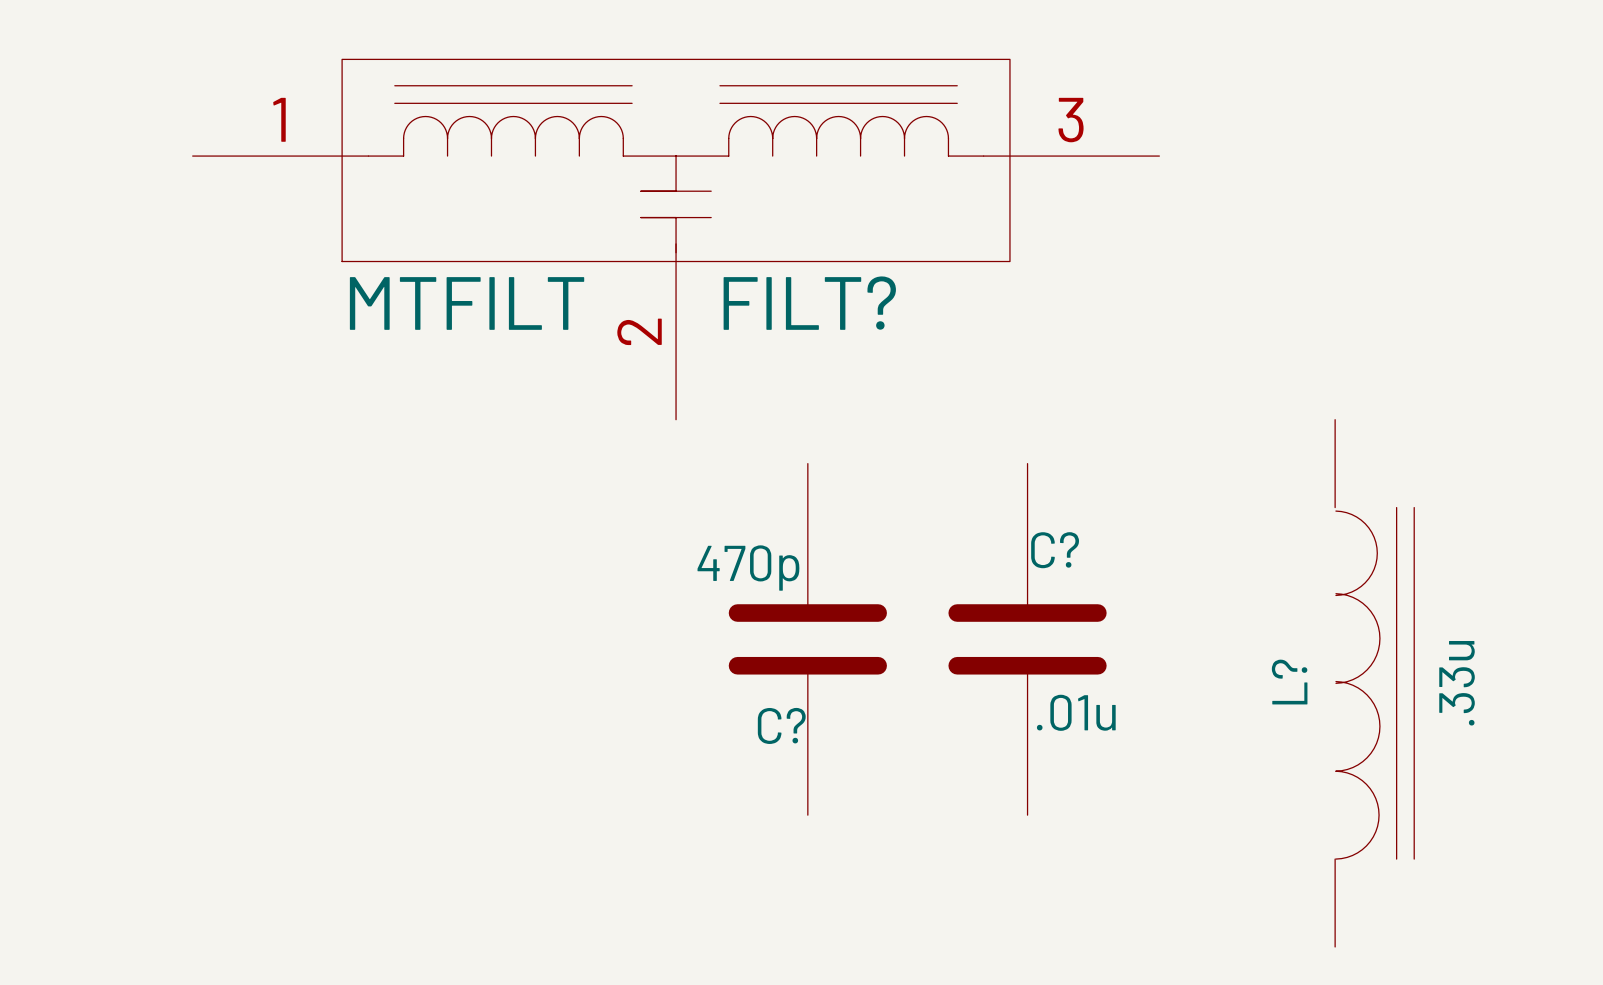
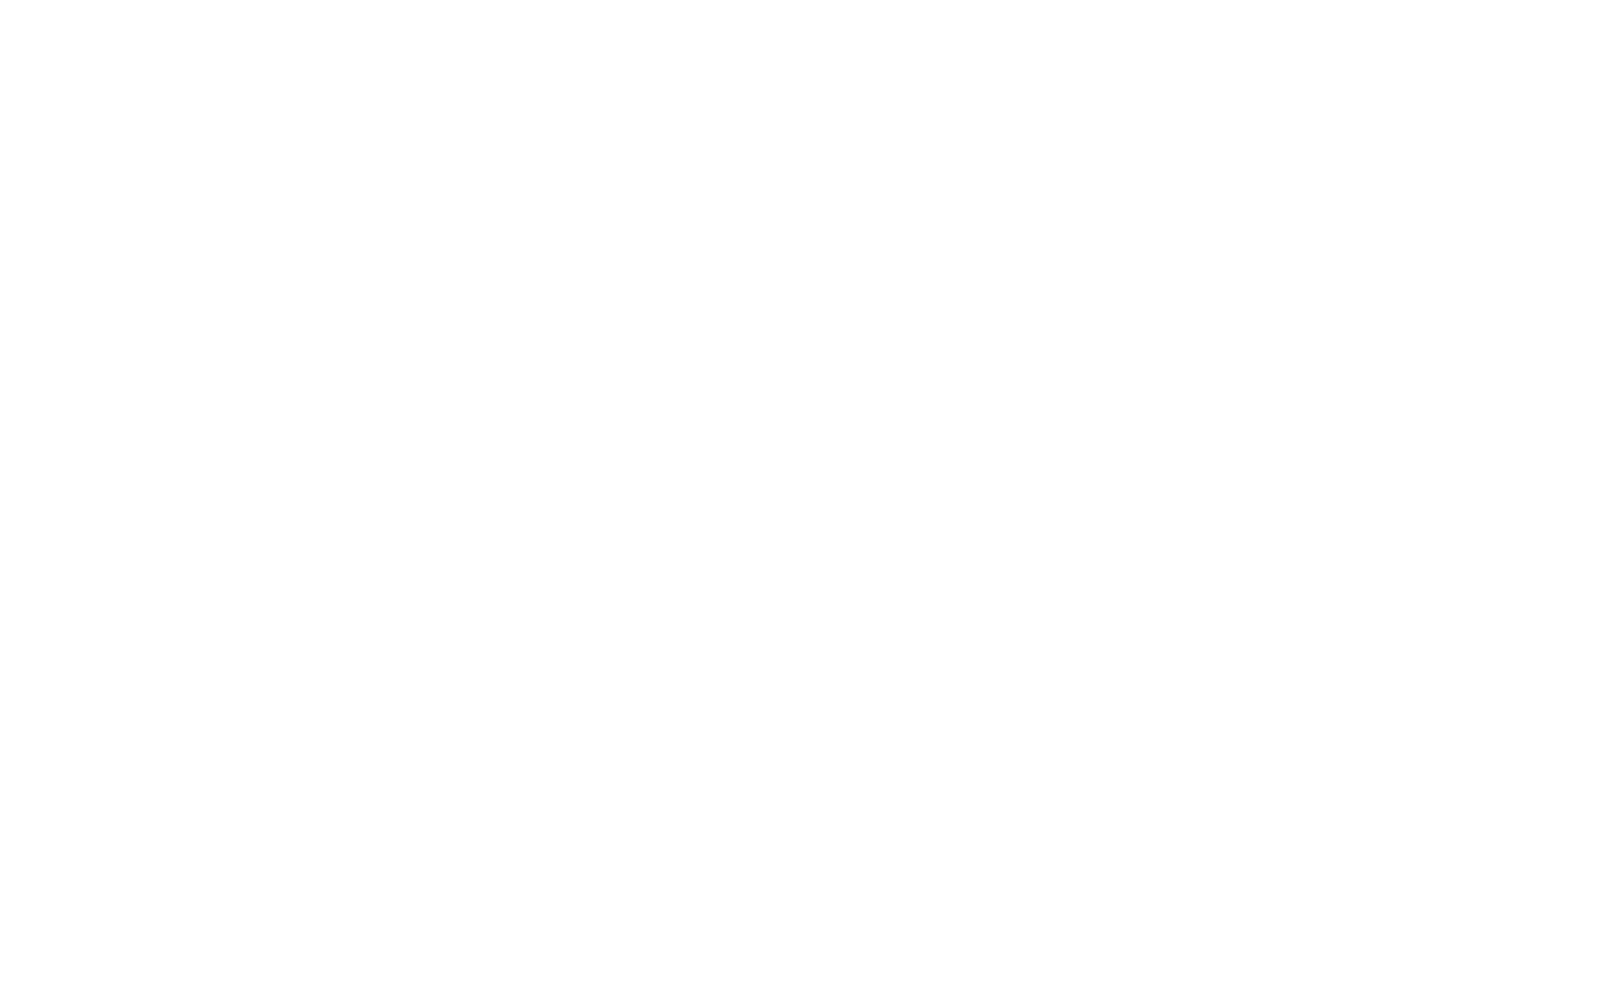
FILT?: MTFILT (676, 239) -> none
C?: 470p (807, 639) -> none
C?: .01u (1027, 639) -> none
L?: .33u (1374, 683) -> none

